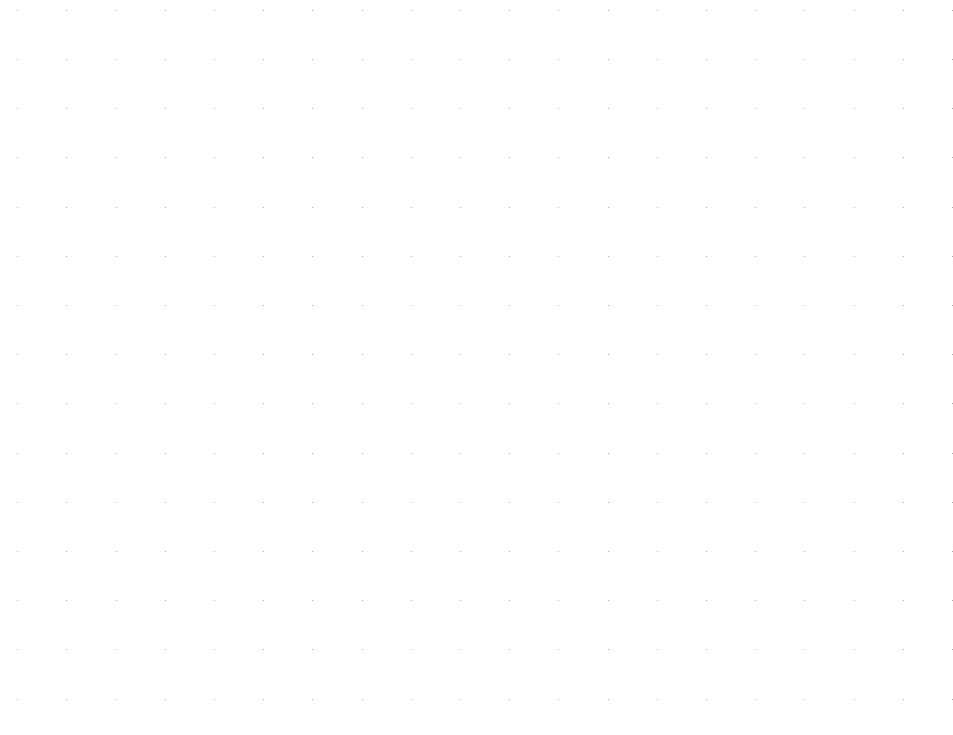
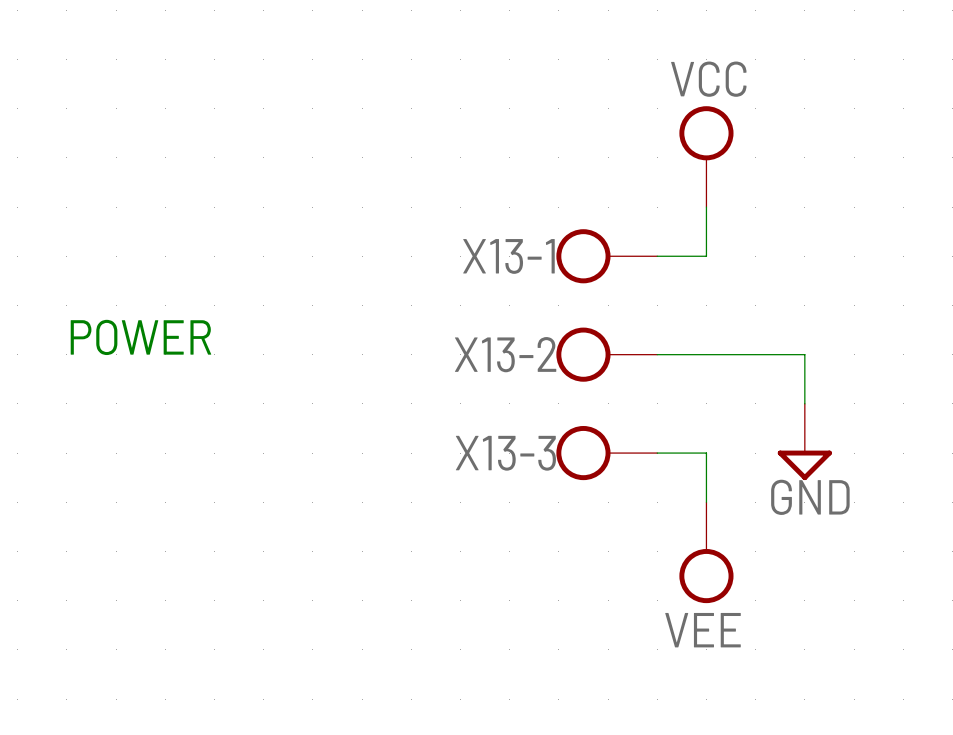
power symbol: none -> VCC (706, 156)
wire: none -> (706, 207) (706, 256) (657, 256)
X13-1: none -> (606, 256)
text: none -> POWER (140, 337)
X13-2: none -> (606, 354)
wire: none -> (657, 354) (804, 354) (804, 403)
power symbol: none -> GND (804, 441)
X13-3: none -> (606, 453)
wire: none -> (657, 453) (706, 453) (706, 502)
power symbol: none -> VEE (706, 552)

